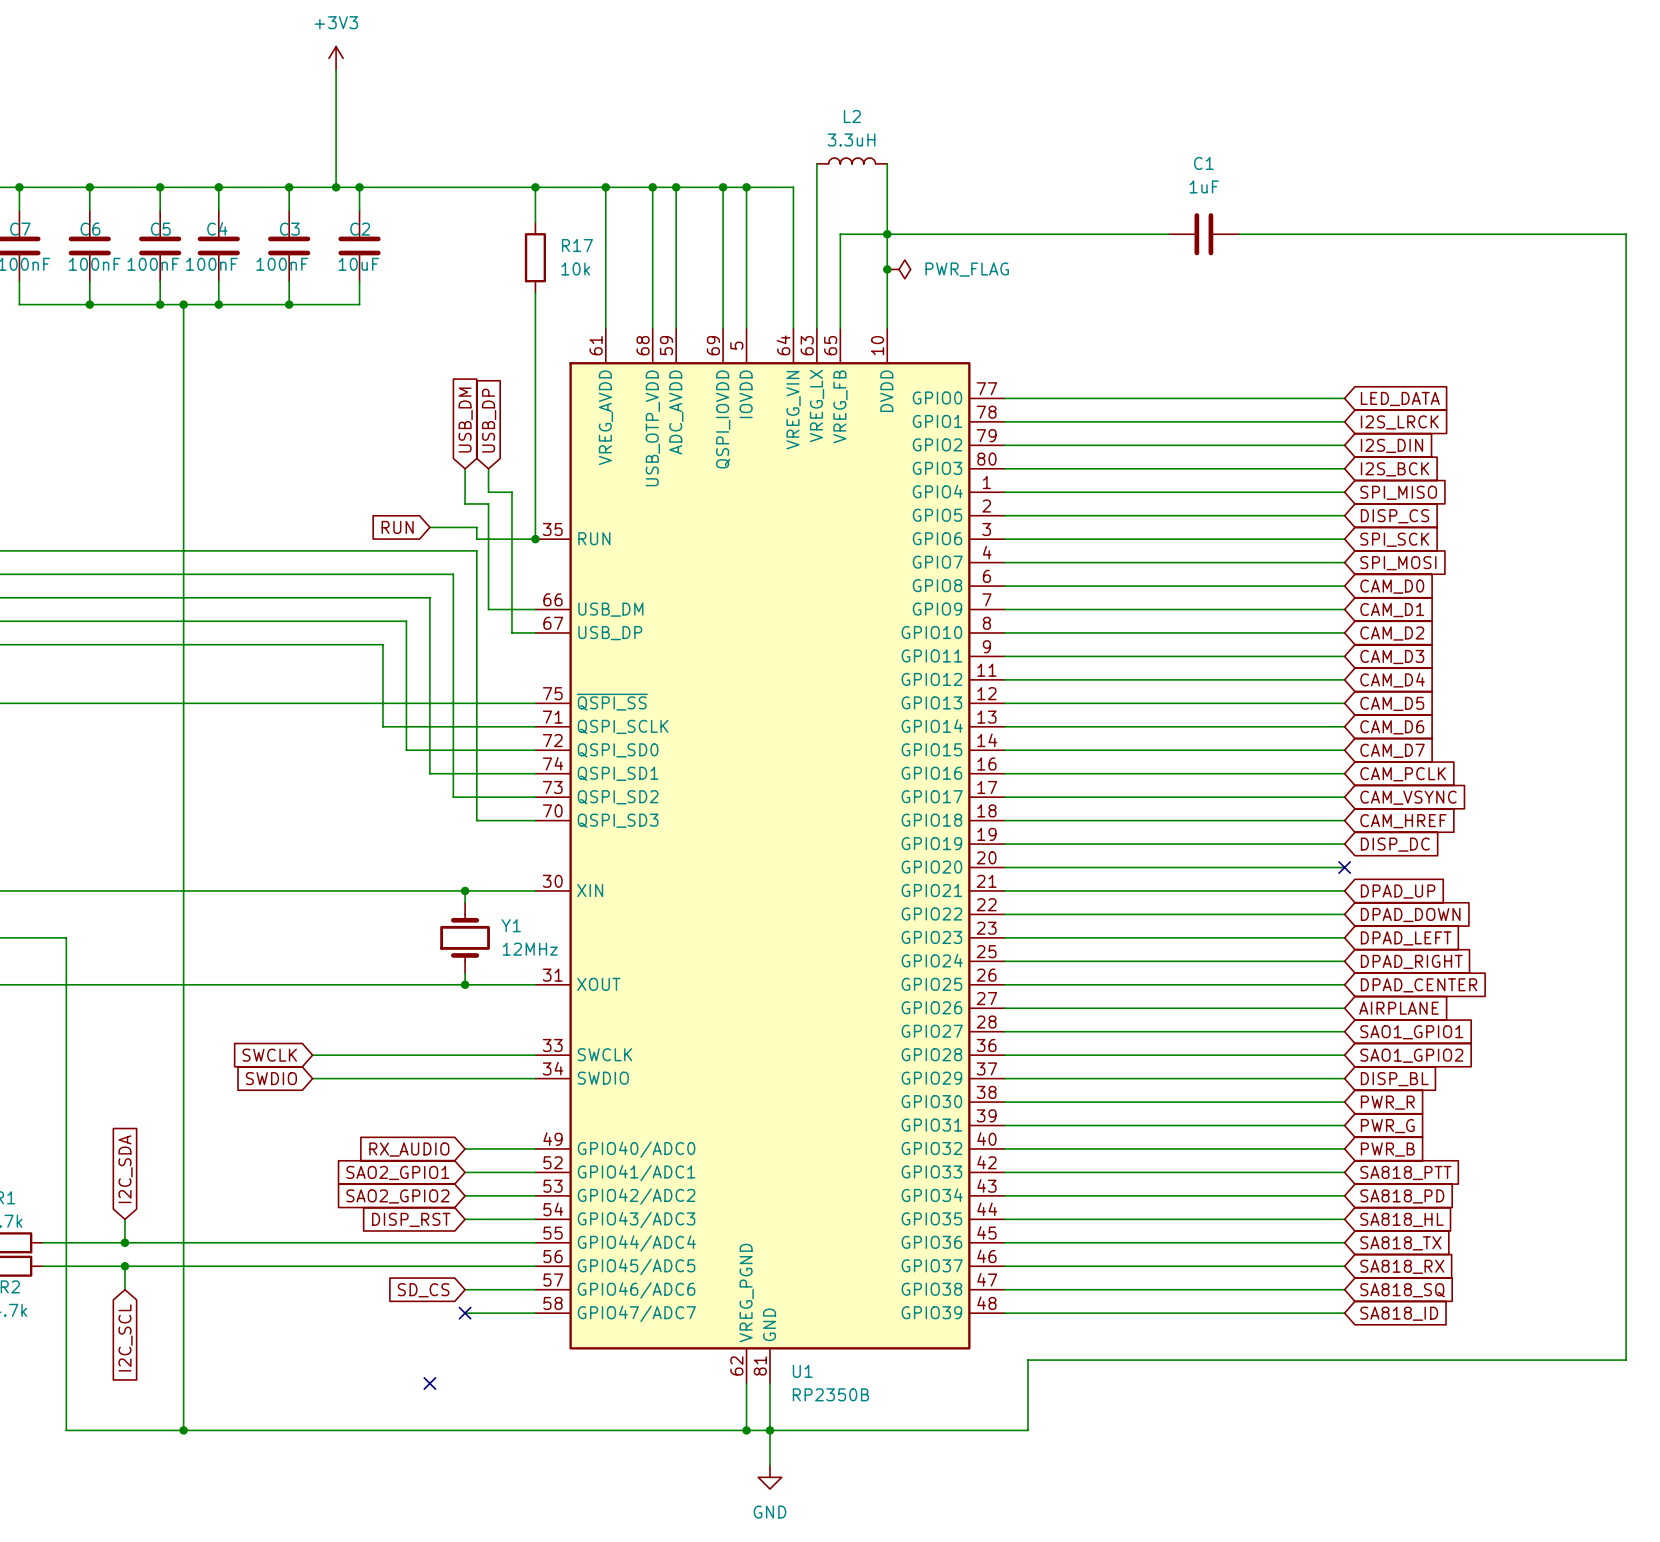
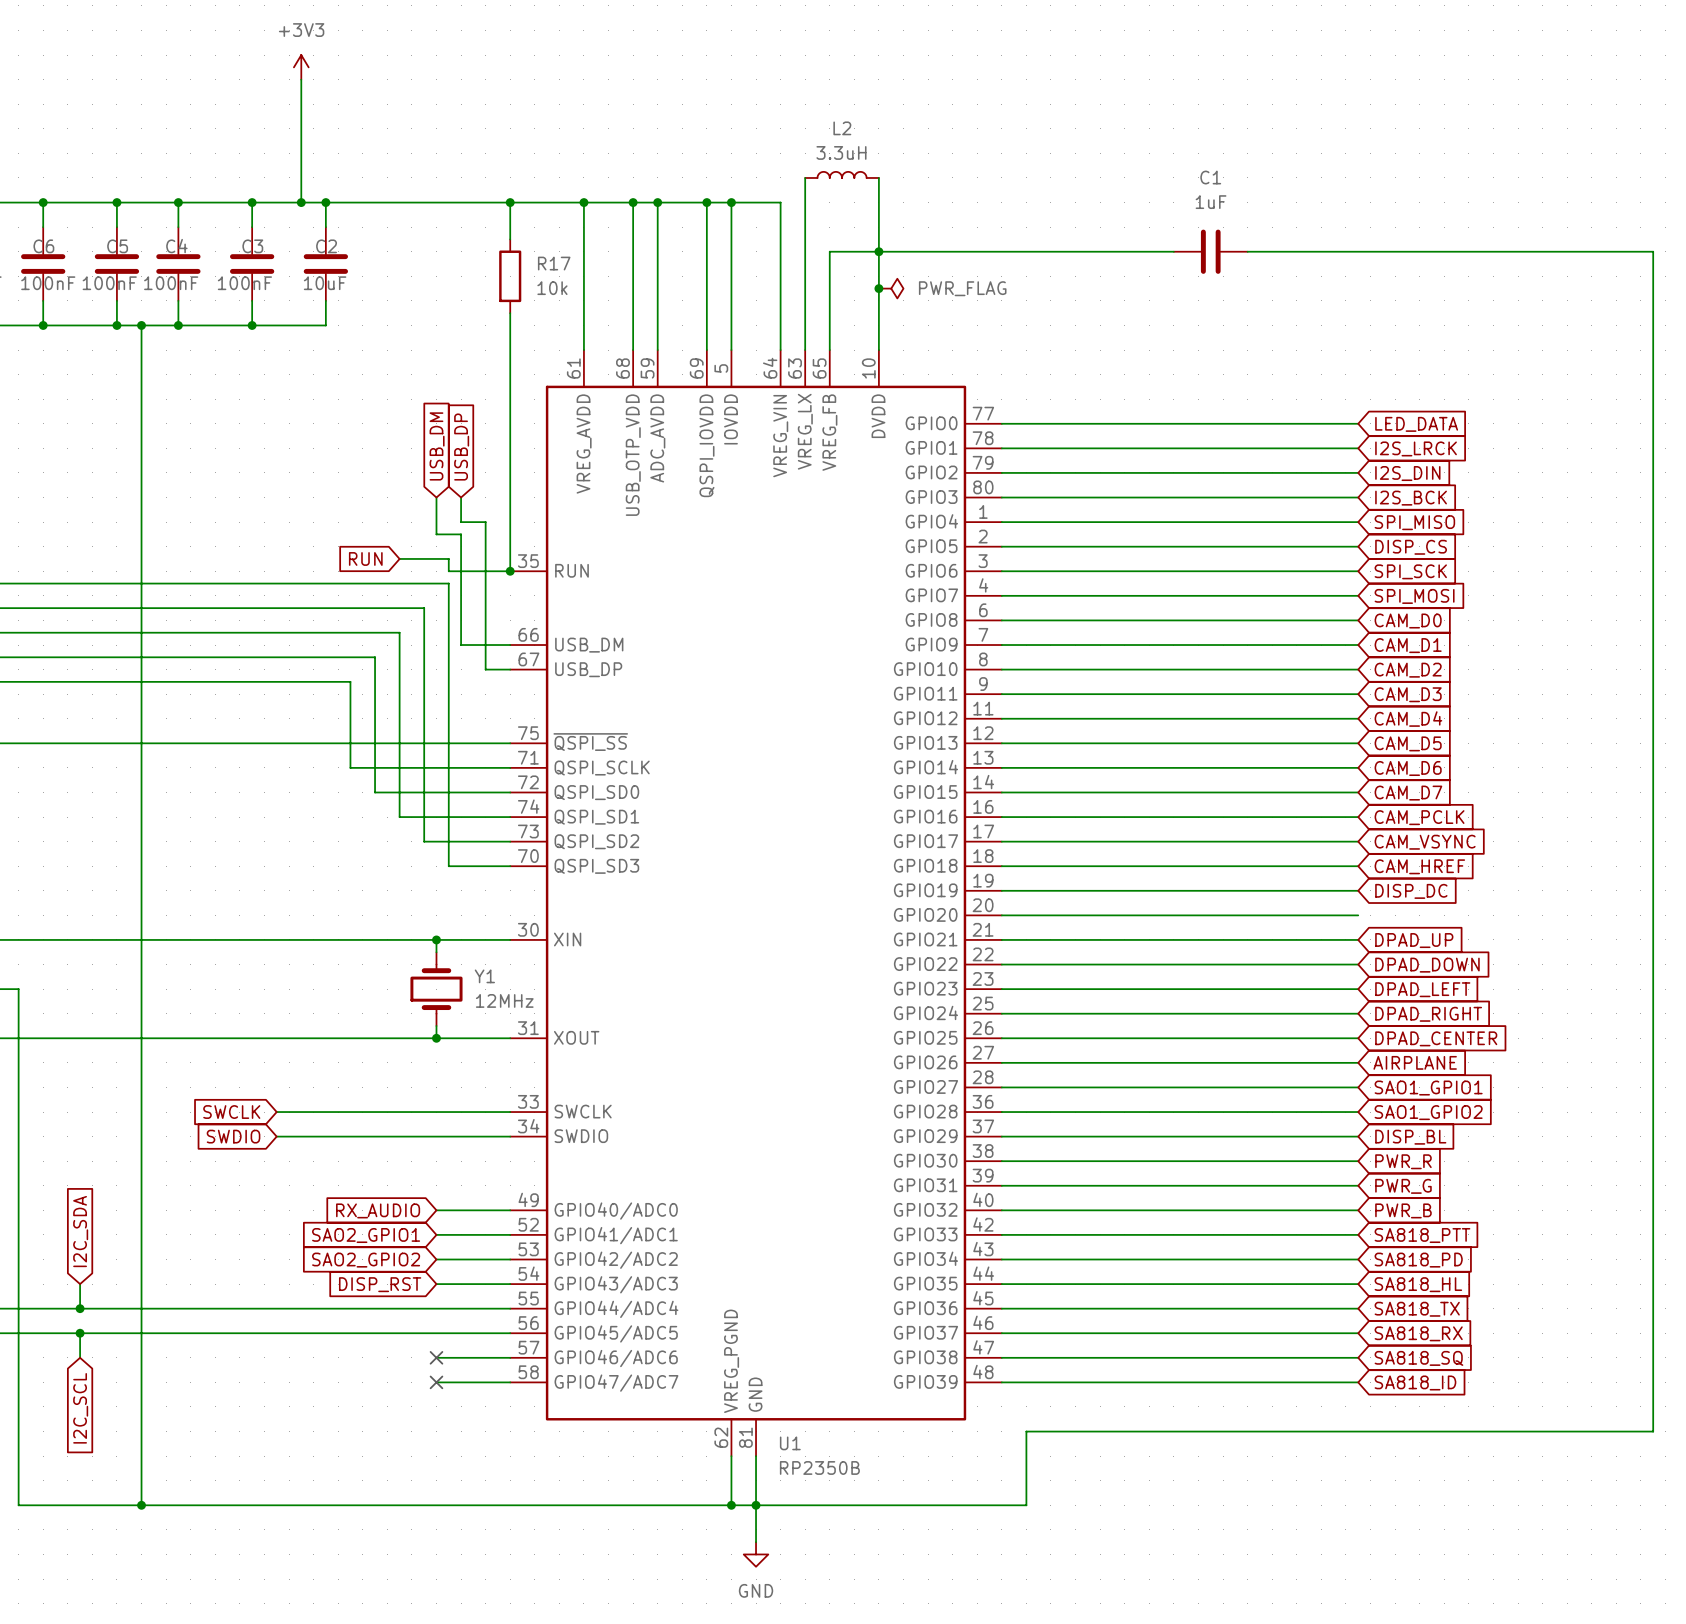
no-connect mark: (1344, 867) -> none
no-connect mark: none -> (436, 1357)
global label: SD_CS (423, 1290) -> none
no-connect mark: (429, 1383) -> none

